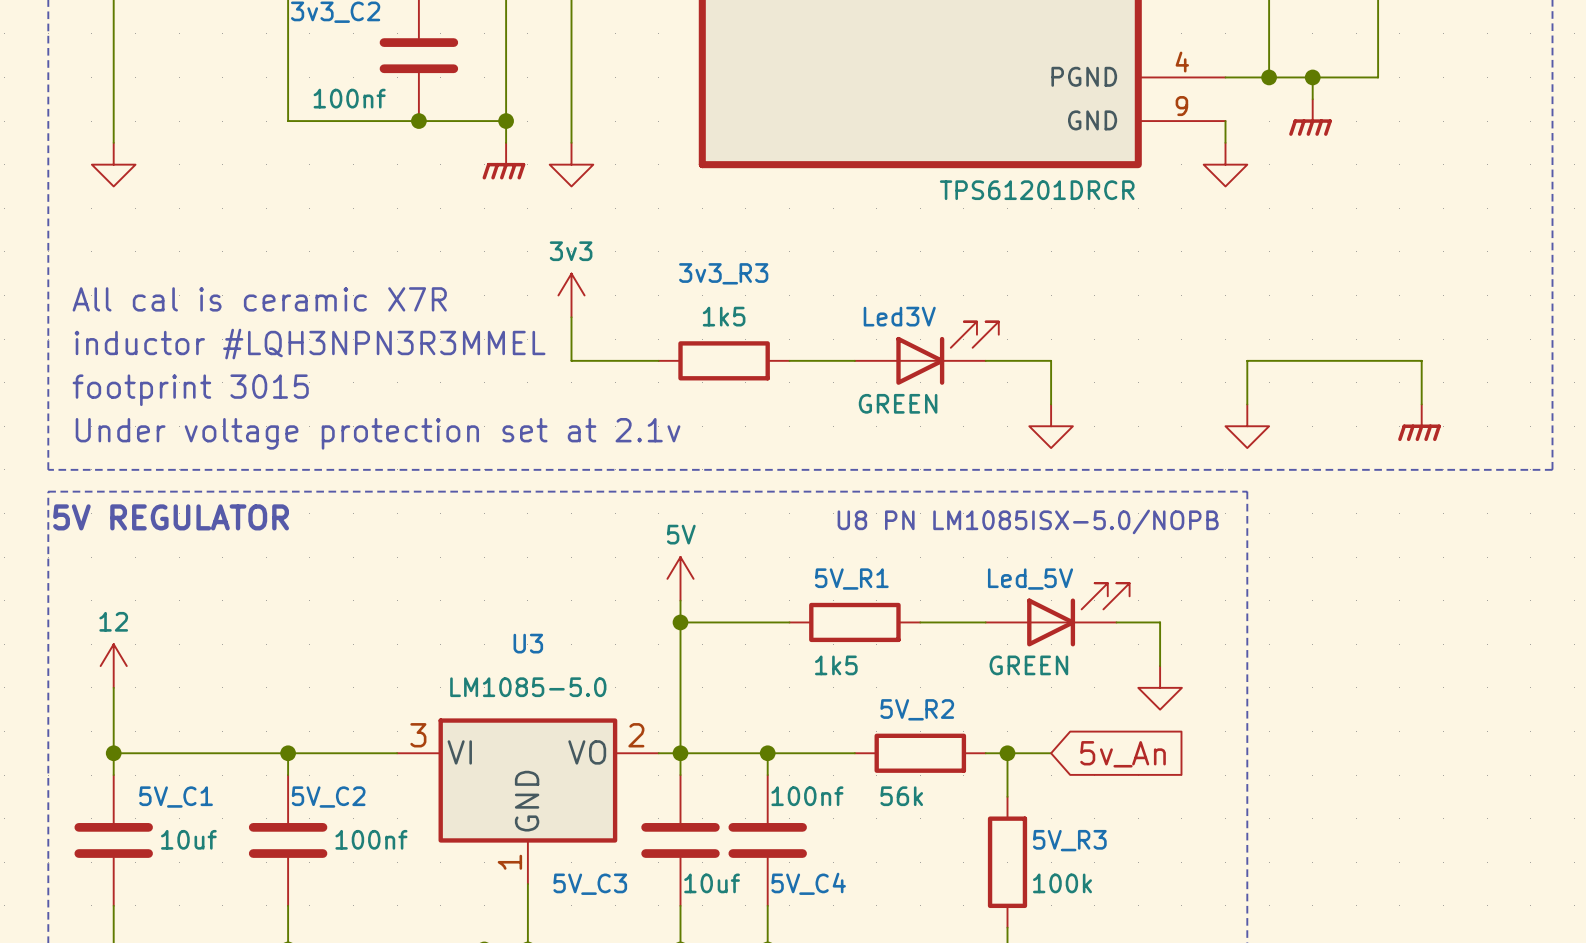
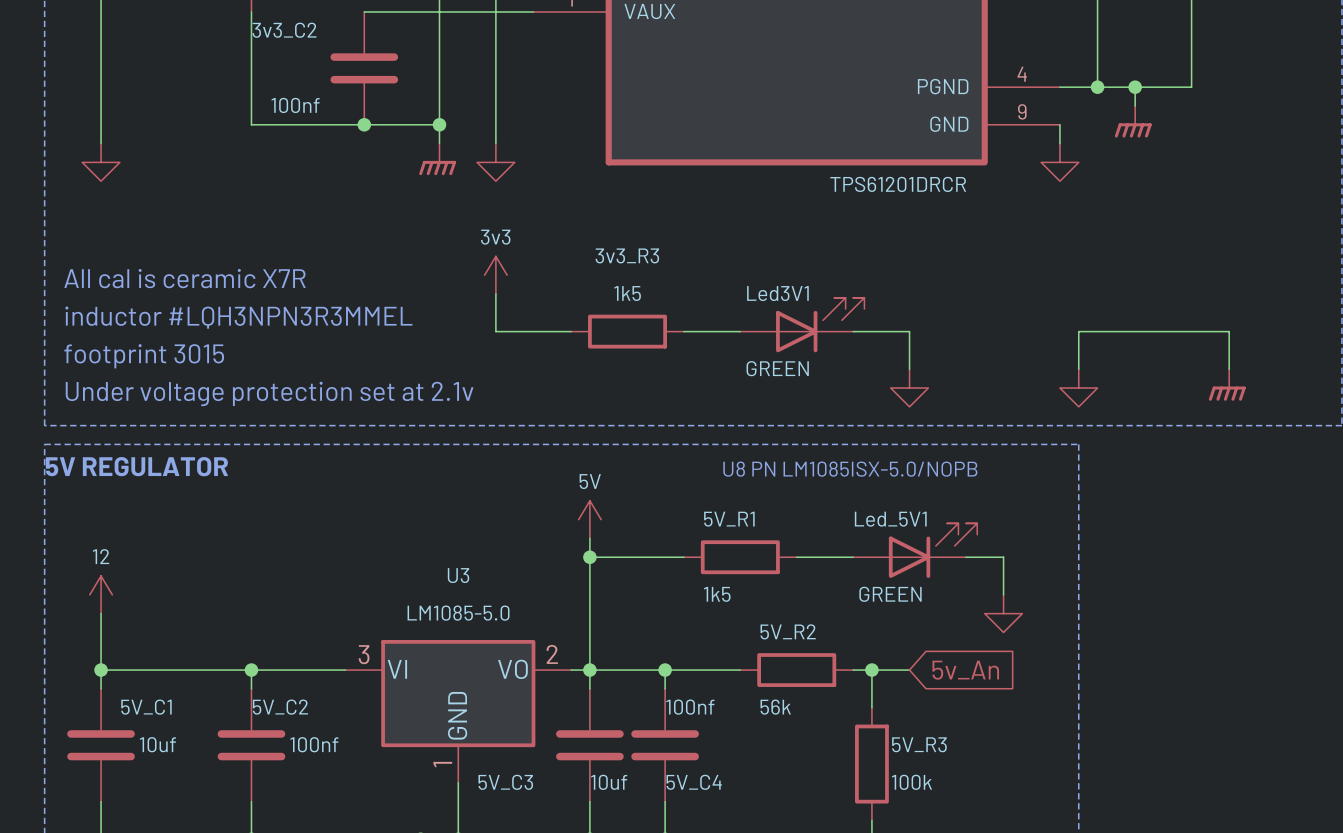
Led3V name: Led3V (899, 316) -> Led3V1 (777, 293)
Led_5V name: Led_5V (1030, 579) -> Led_5V1 (890, 519)

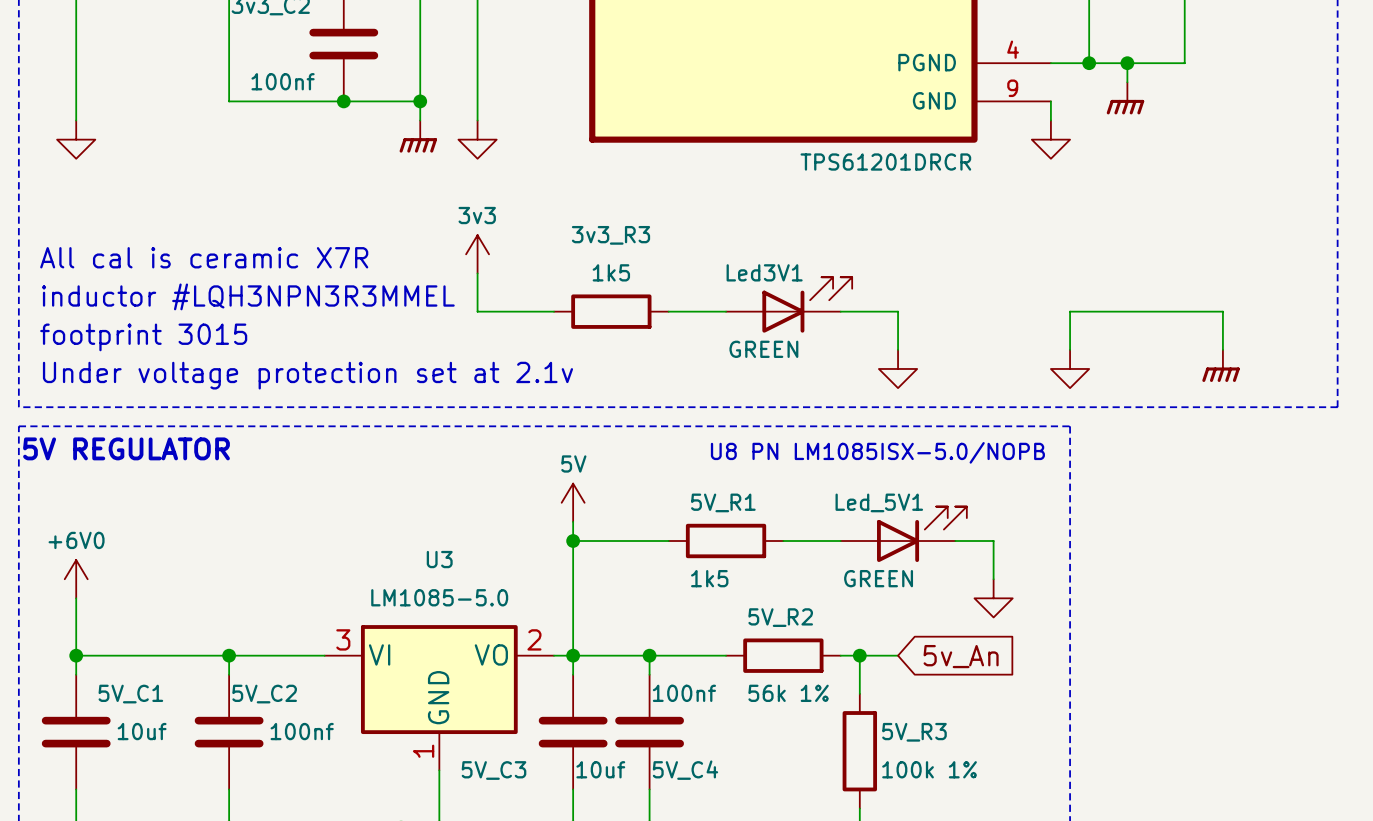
power symbol: 12 (101, 594) -> +6V0 (76, 579)
5V_R2 value: 56k (775, 707) -> 56k 1% (788, 693)
5V_R3 value: 100k (911, 782) -> 100k 1% (929, 769)

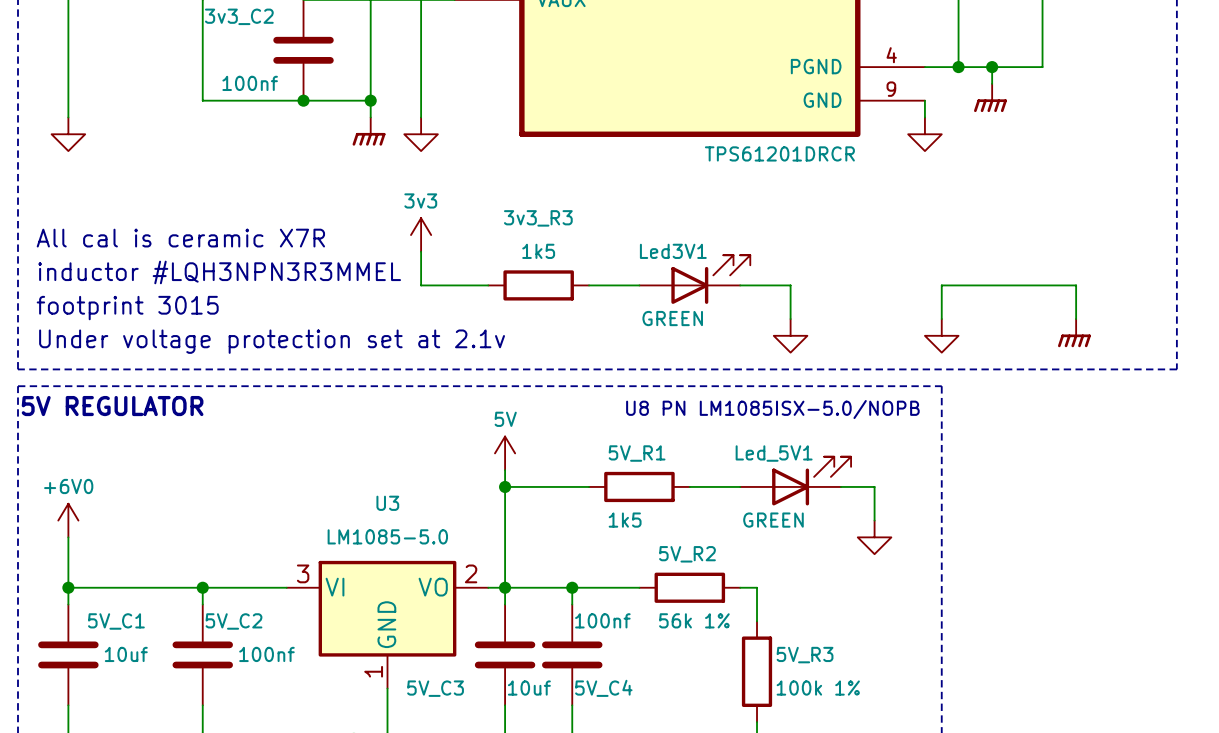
wire: (859, 655) (898, 655) -> none
junction: (859, 655) -> none
global label: 5v_An (961, 656) -> none

